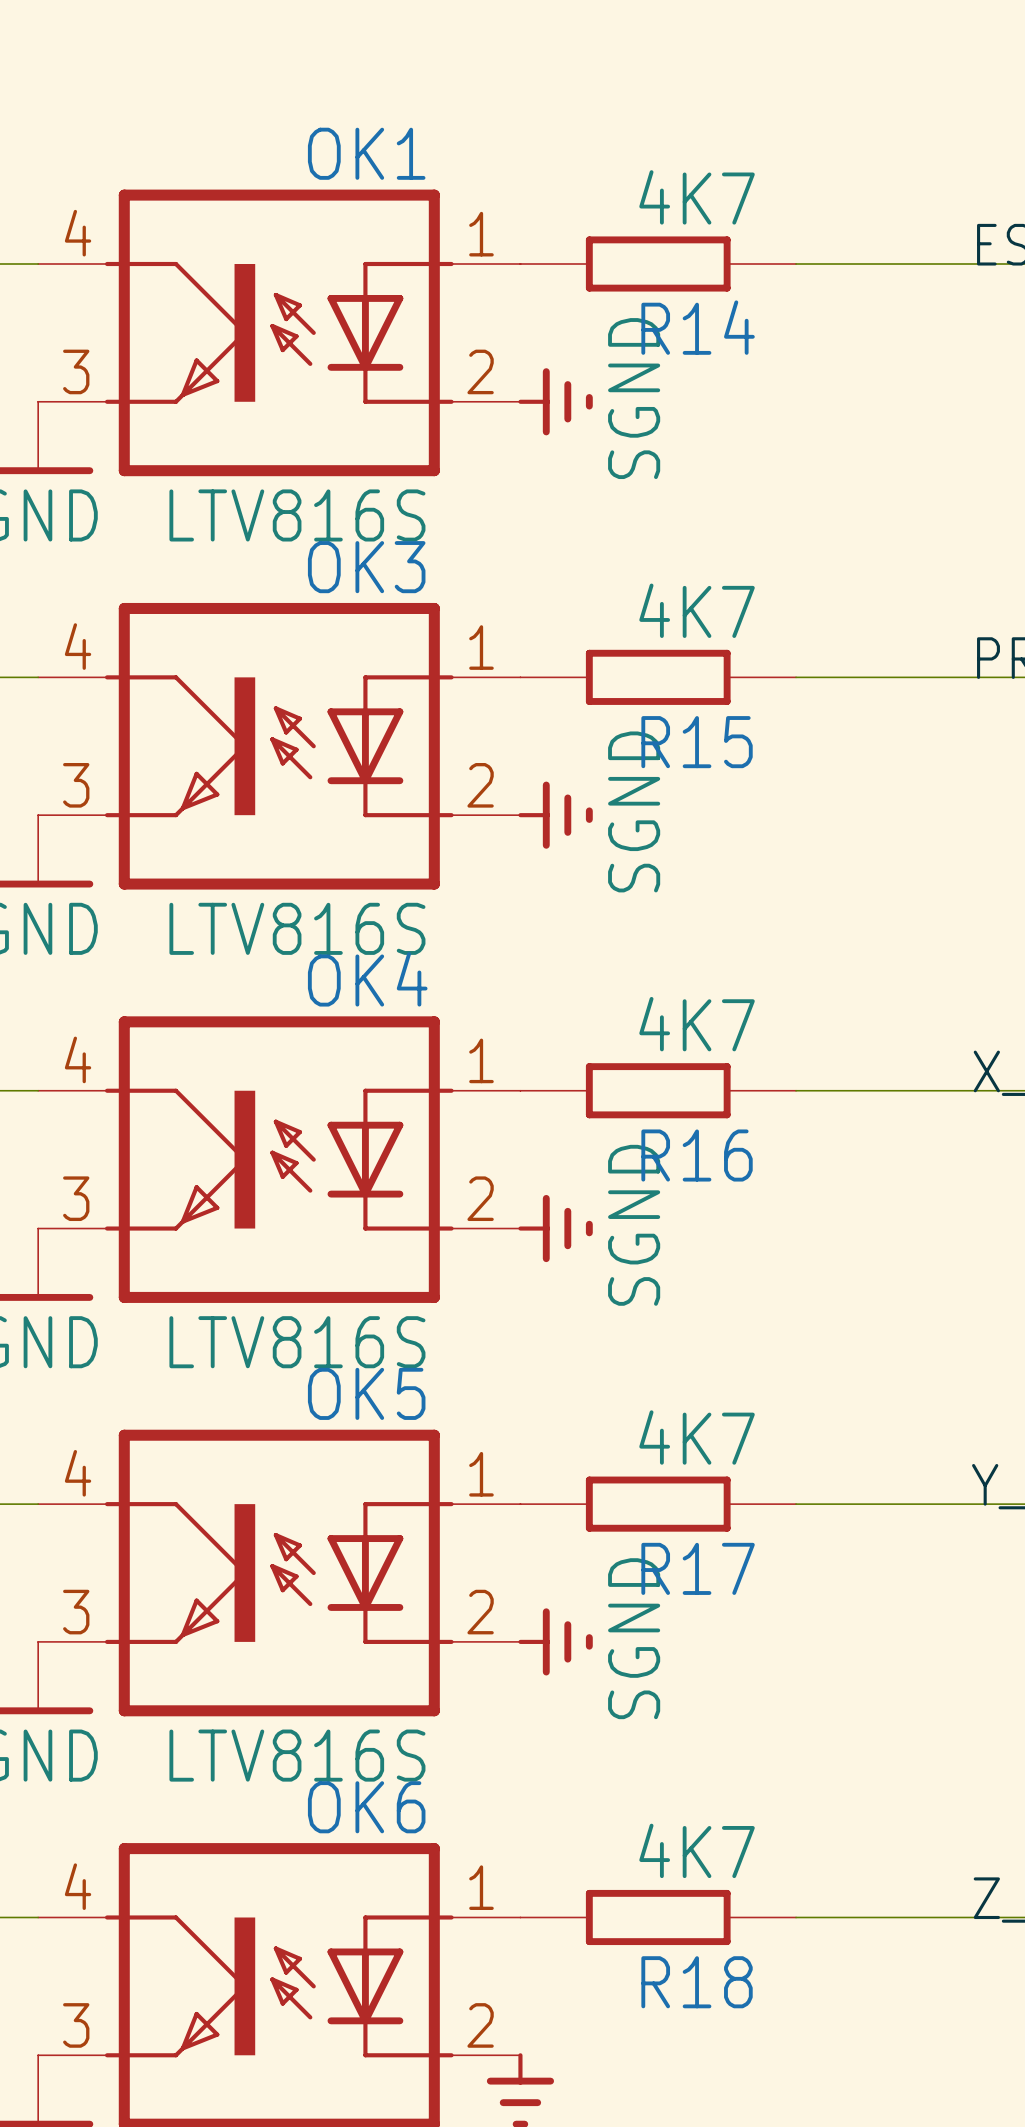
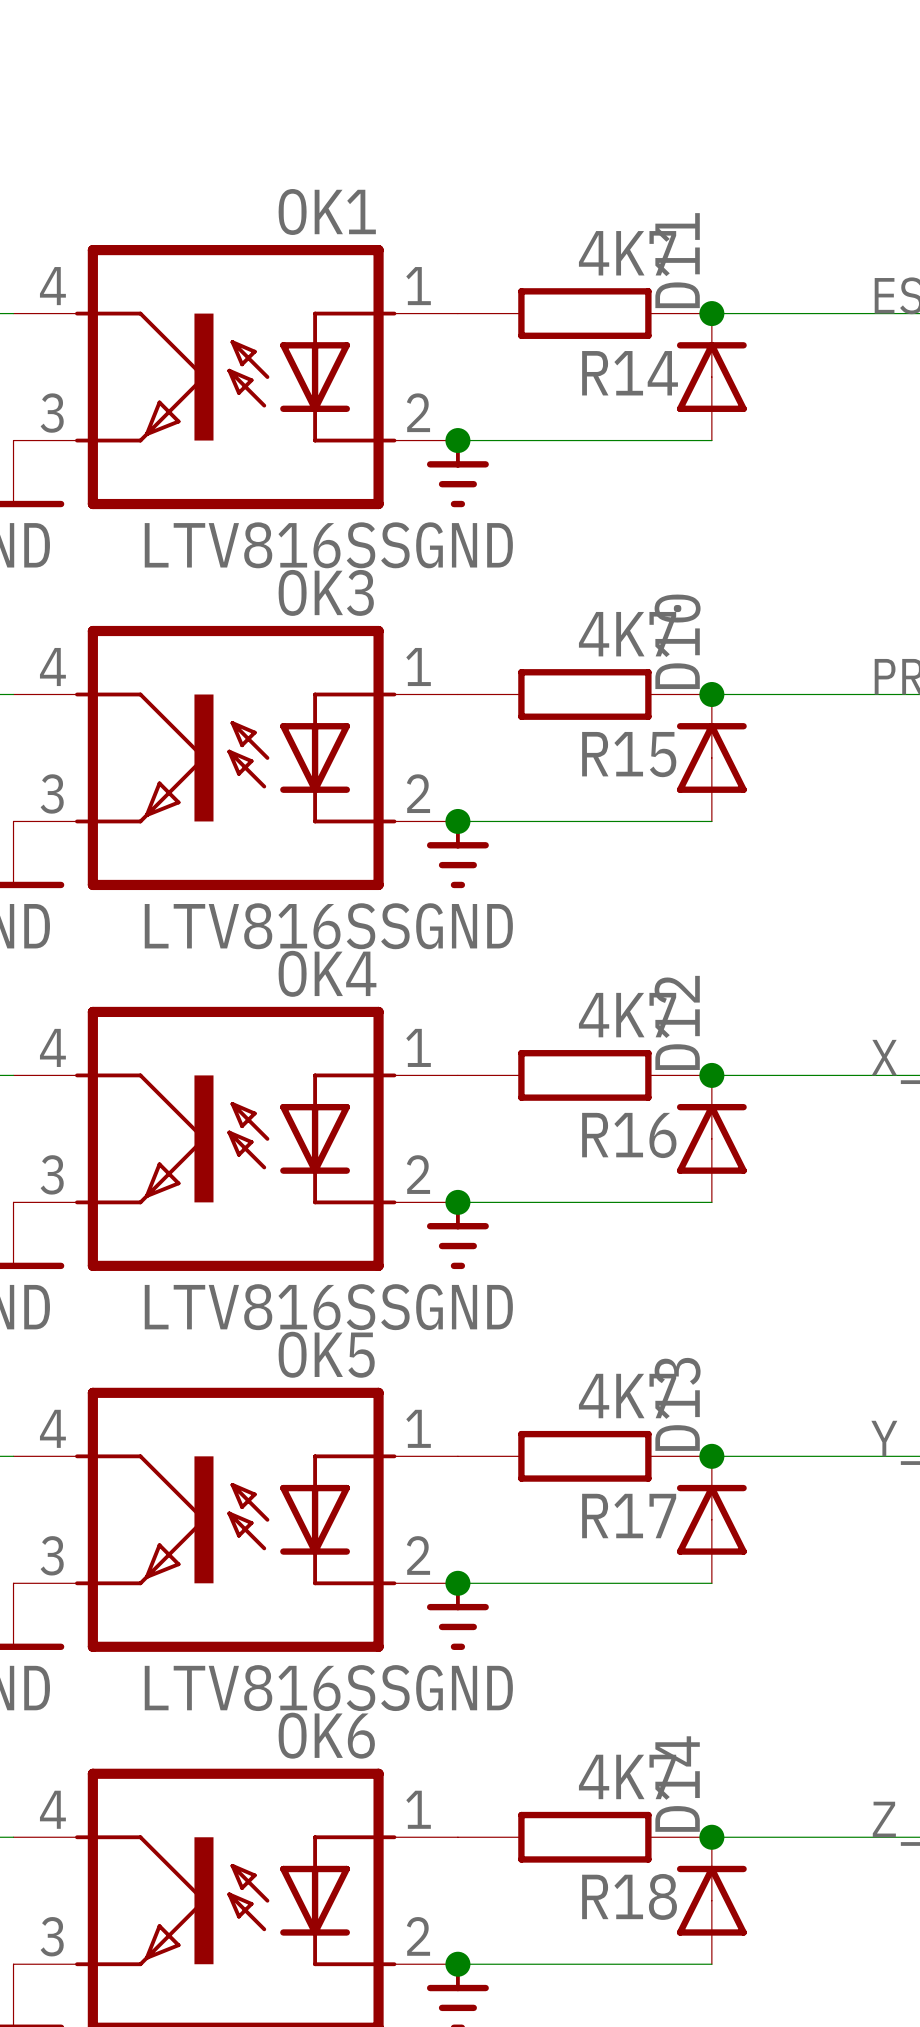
junction: none -> (711, 313)
D11: none -> (711, 377)
wire: none -> (457, 440) (711, 440)
junction: none -> (457, 440)
power symbol rotation: 0° (555, 401) -> 90° clockwise (457, 472)
power symbol position: SGND (555, 401) -> SGND (457, 472)
junction: none -> (711, 694)
D10: none -> (711, 757)
wire: none -> (457, 821) (711, 821)
junction: none -> (457, 821)
power symbol rotation: 0° (555, 815) -> 90° clockwise (457, 853)
power symbol position: SGND (555, 815) -> SGND (457, 853)
junction: none -> (711, 1075)
D12: none -> (711, 1138)
wire: none -> (457, 1202) (711, 1202)
junction: none -> (457, 1202)
power symbol rotation: 0° (555, 1228) -> 90° clockwise (457, 1234)
power symbol position: SGND (555, 1228) -> SGND (457, 1234)
junction: none -> (711, 1456)
D13: none -> (711, 1519)
wire: none -> (457, 1583) (711, 1583)
junction: none -> (457, 1583)
power symbol rotation: 0° (555, 1641) -> 90° clockwise (457, 1615)
power symbol position: SGND (555, 1641) -> SGND (457, 1615)
junction: none -> (711, 1837)
D14: none -> (711, 1900)
wire: none -> (457, 1964) (711, 1964)
junction: none -> (457, 1964)

